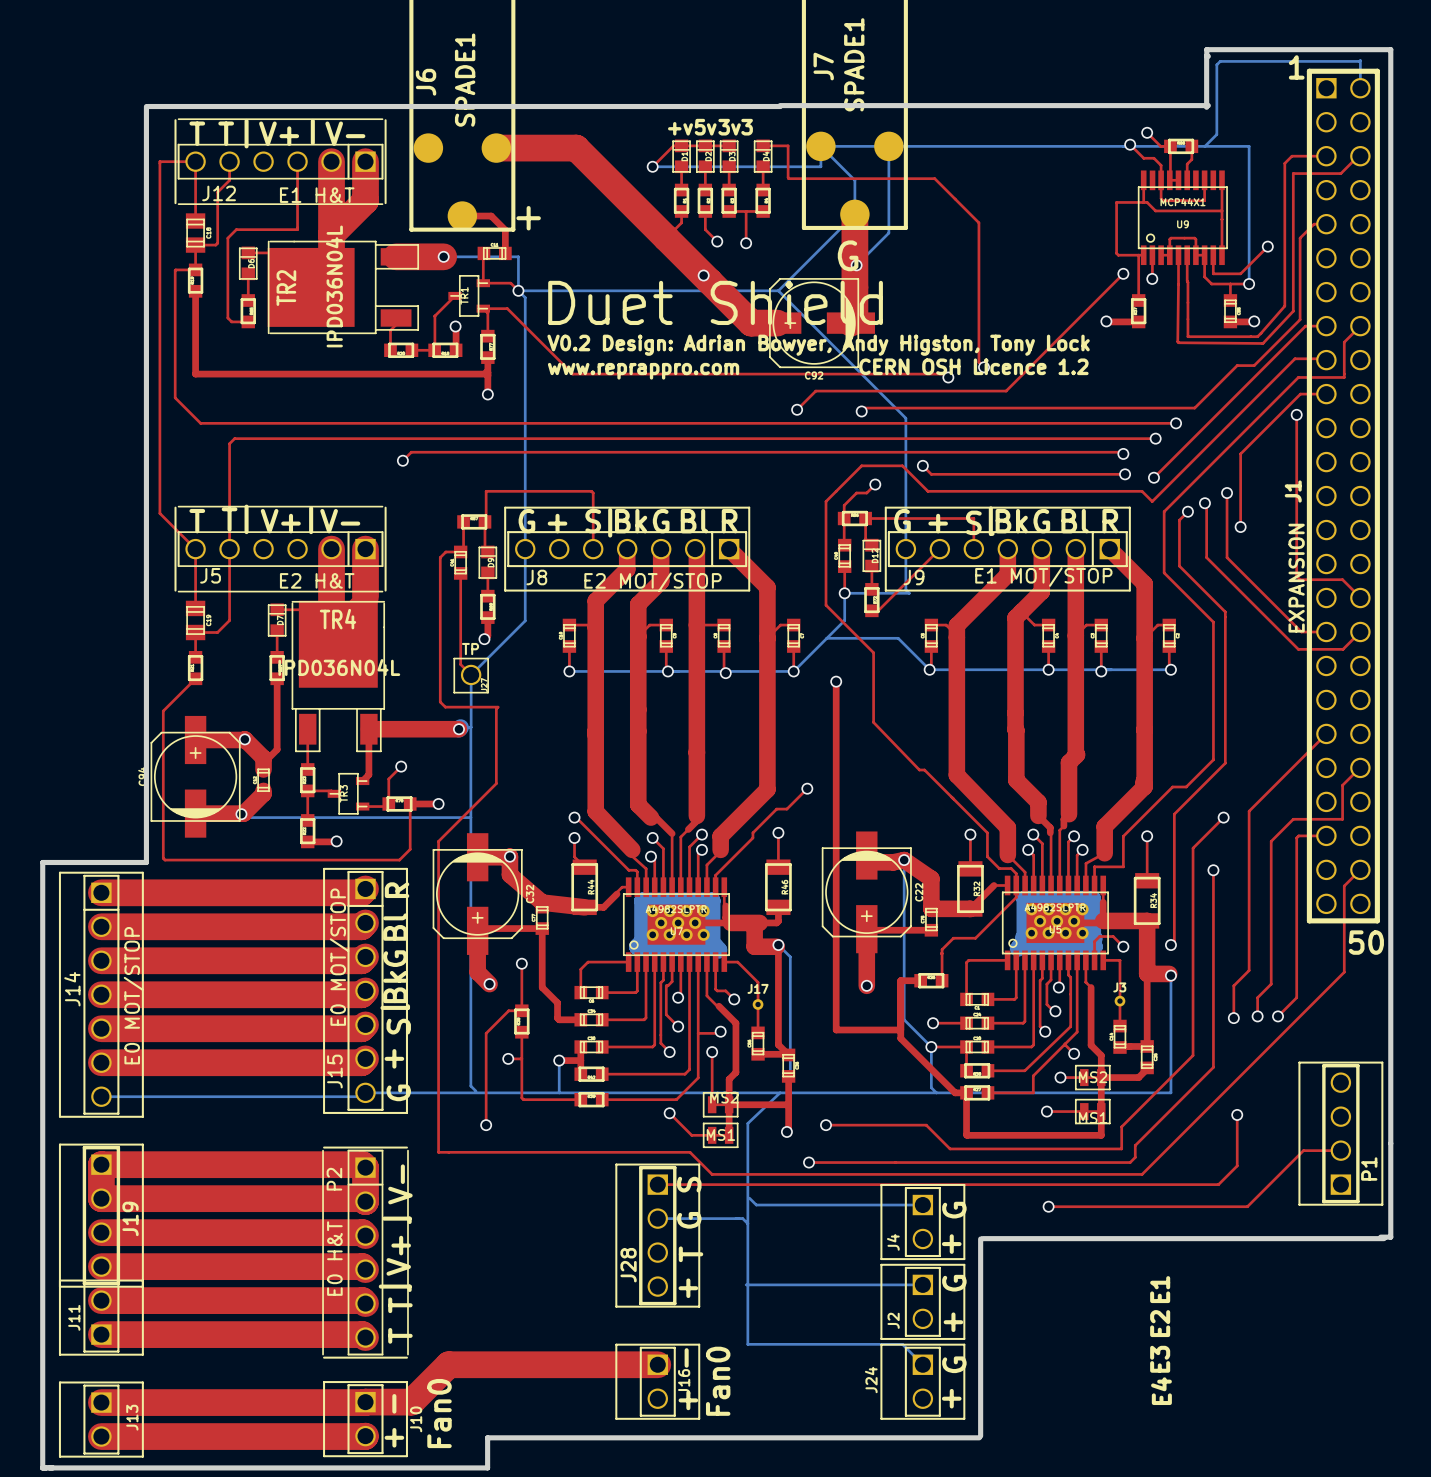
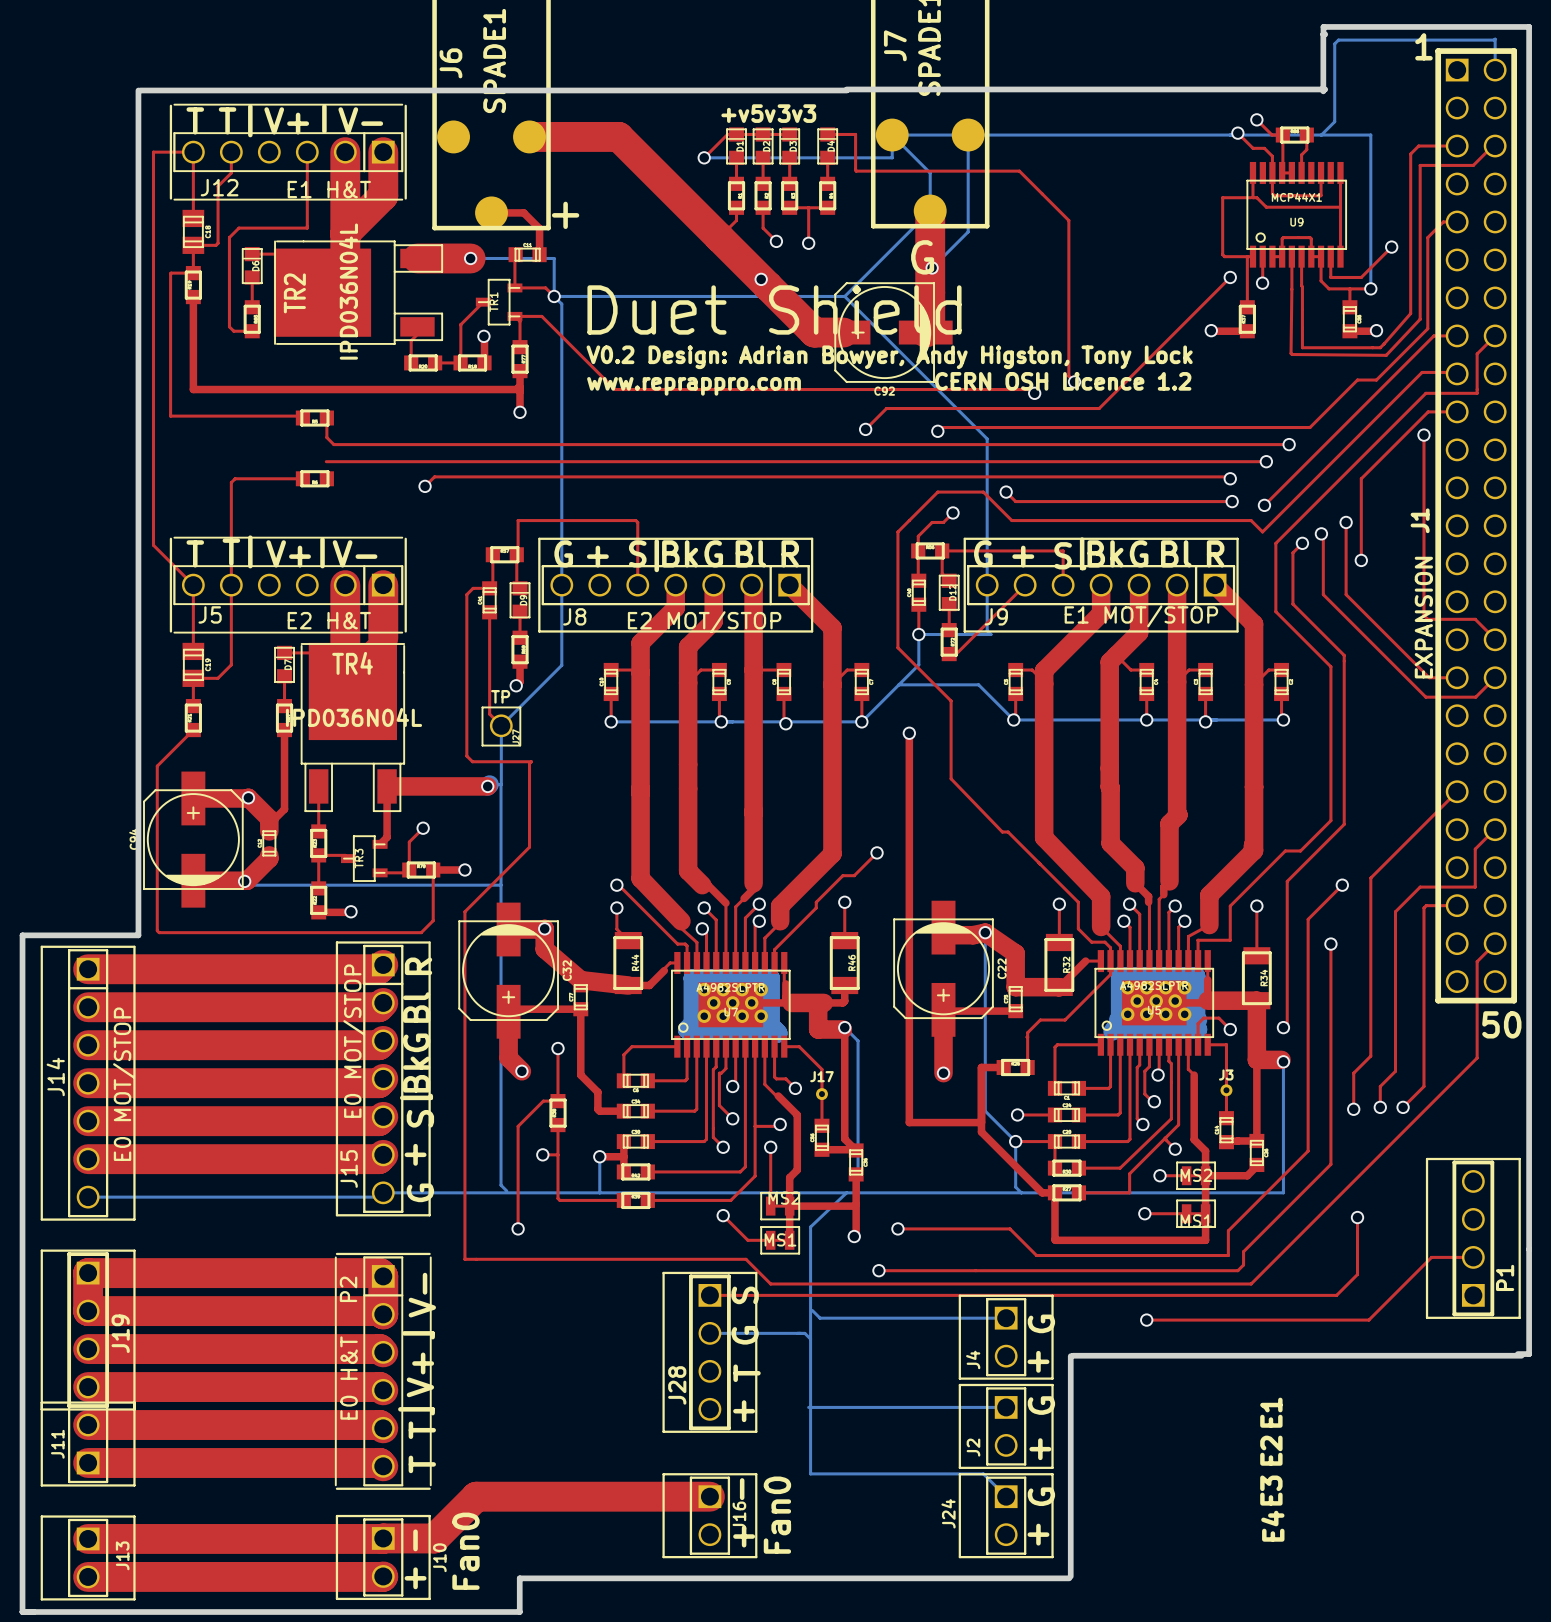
top track: (175, 397) (200, 423) (321, 423) -> (170, 416) (301, 416) (302, 418)
part: none -> (314, 418)
top track: none -> (326, 418) (326, 437) (333, 444)
top track: (314, 438) (234, 438) (229, 443) (229, 457) -> (302, 478) (235, 478) (231, 482)
part: none -> (314, 478)

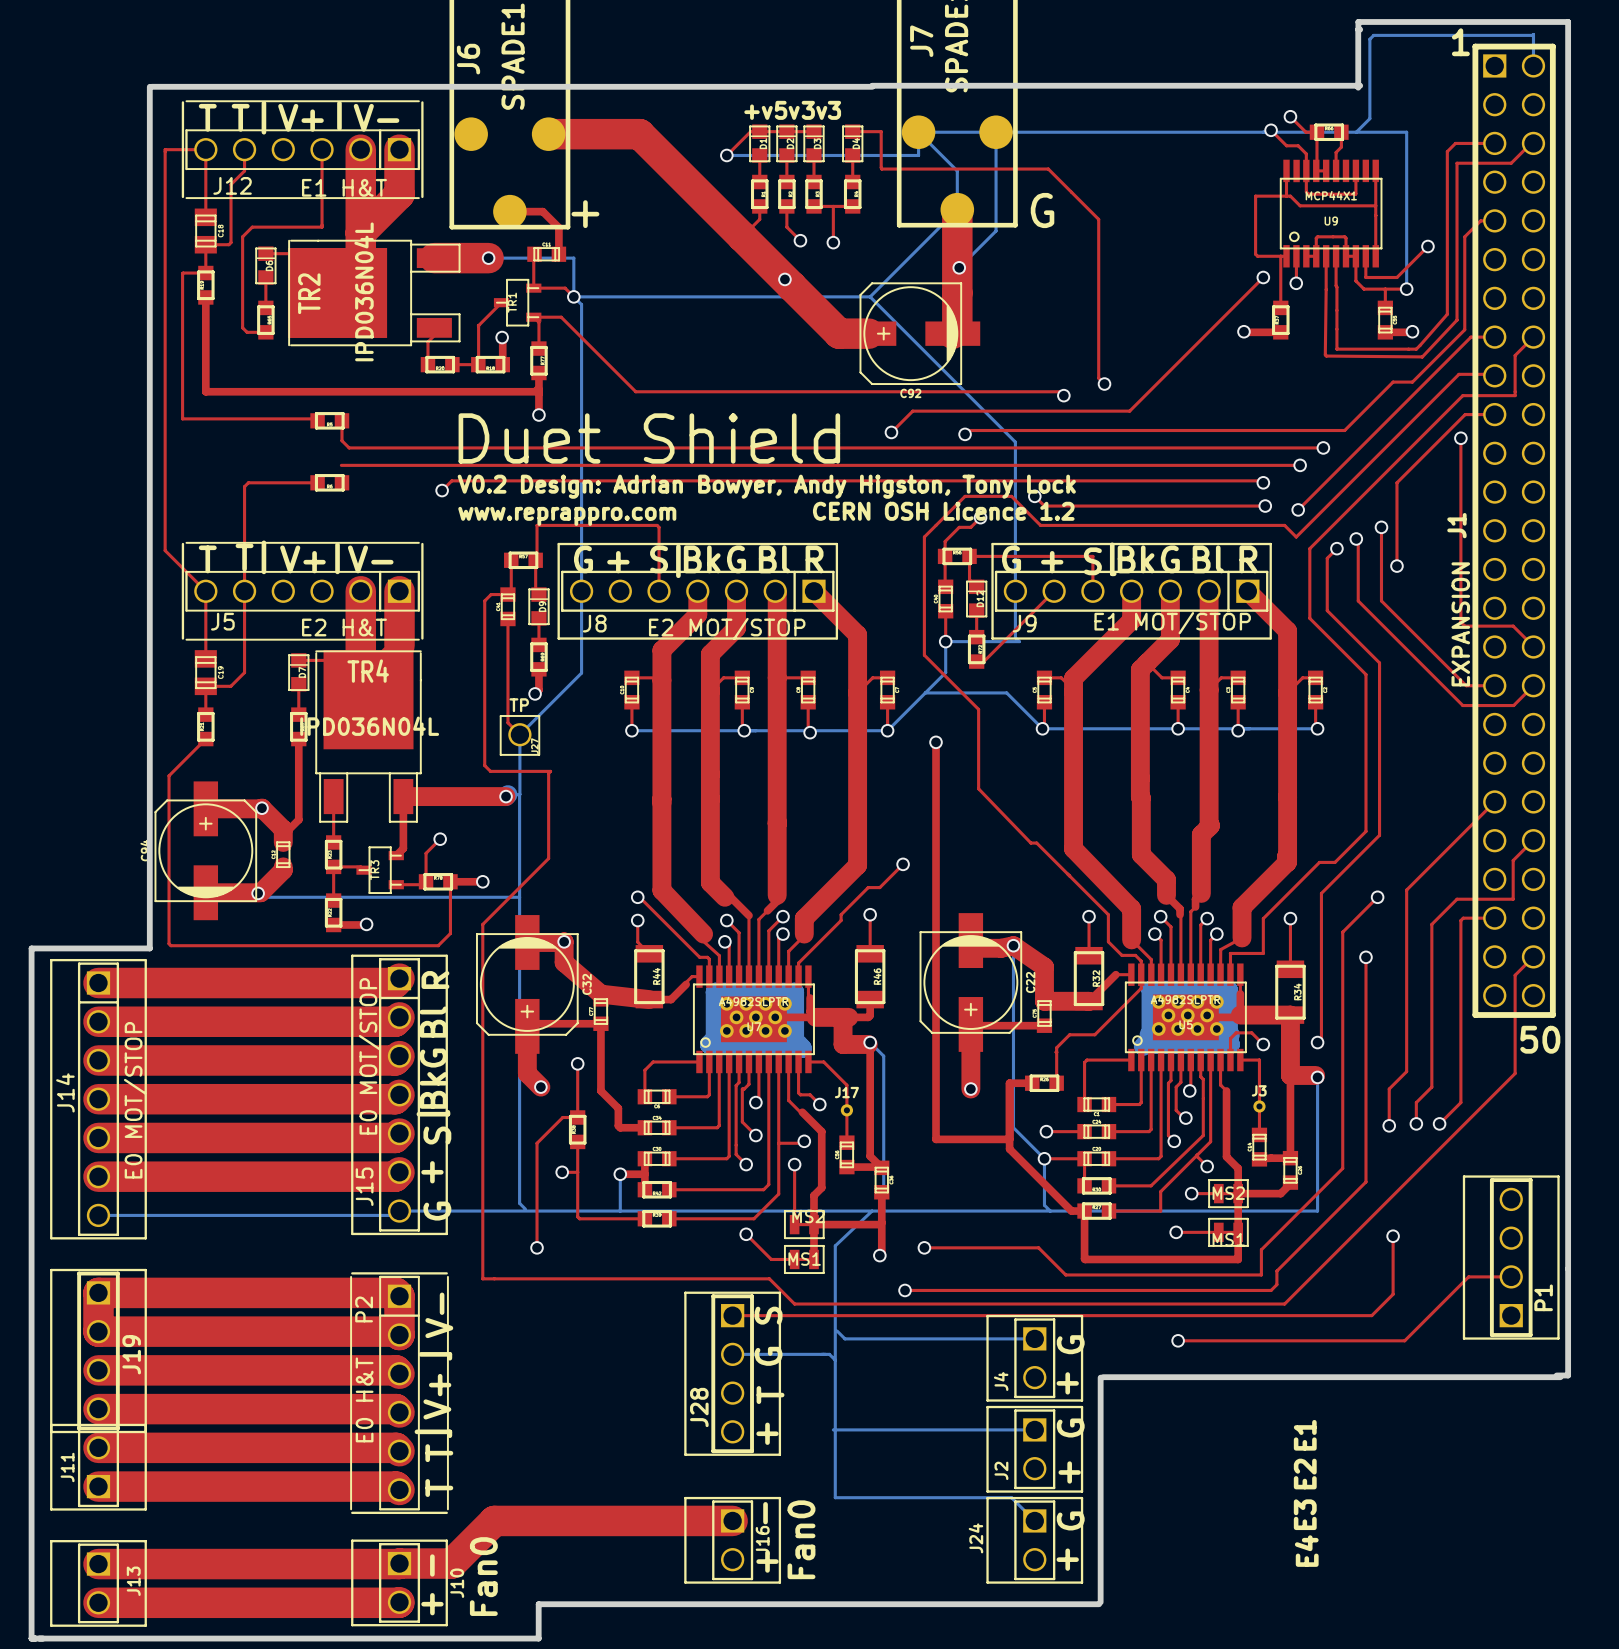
text position: G (922, 257) -> G (1042, 210)
text position: Duet Shield (774, 309) -> Duet Shield (649, 438)
text position: V0.2 Design: Adrian Bowyer, Andy Higston, Tony Lock (889, 357) -> V0.2 Design: Adrian Bowyer, Andy Higston, Tony Lock (766, 486)
text position: CERN OSH Licence 1.2 (1063, 381) -> CERN OSH Licence 1.2 (943, 511)
text position: www.reprappro.com (694, 386) -> www.reprappro.com (567, 516)

